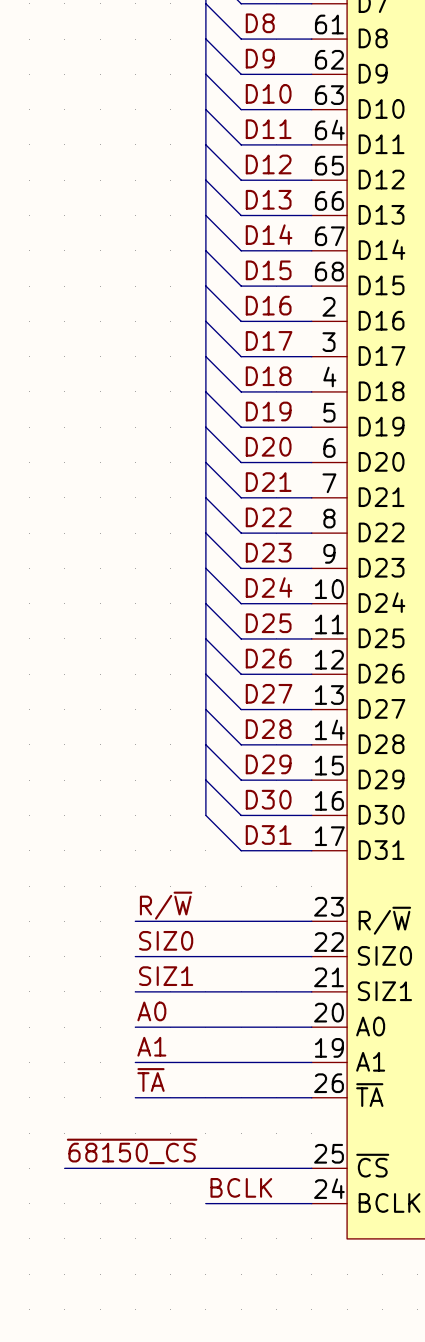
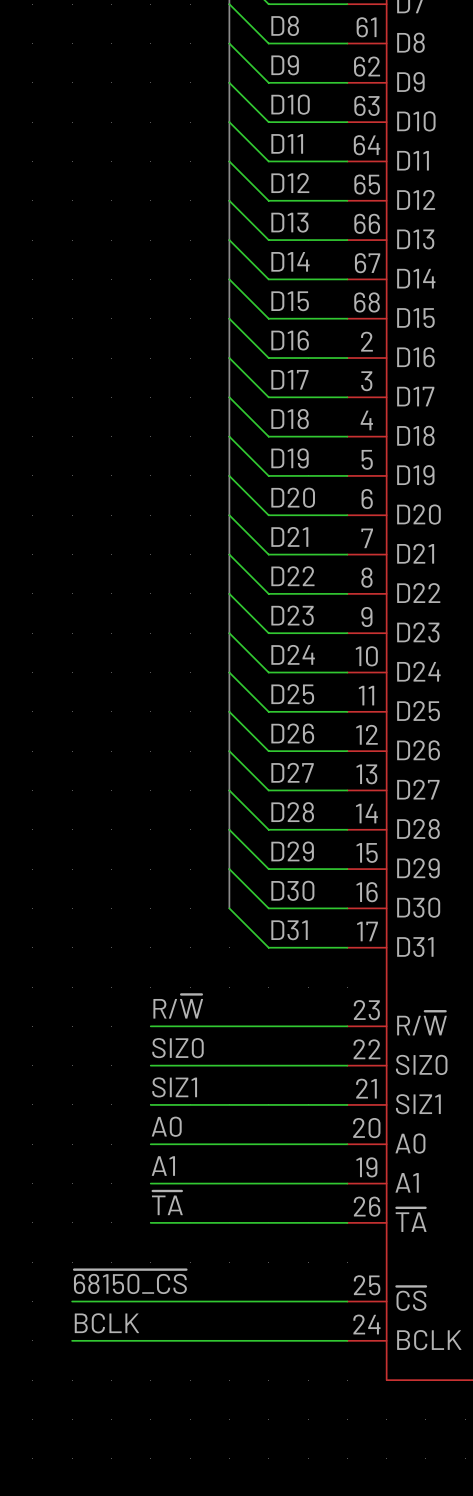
label position: BCLK (241, 1187) -> BCLK (106, 1323)
wire: none -> (72, 1340) (229, 1340)

